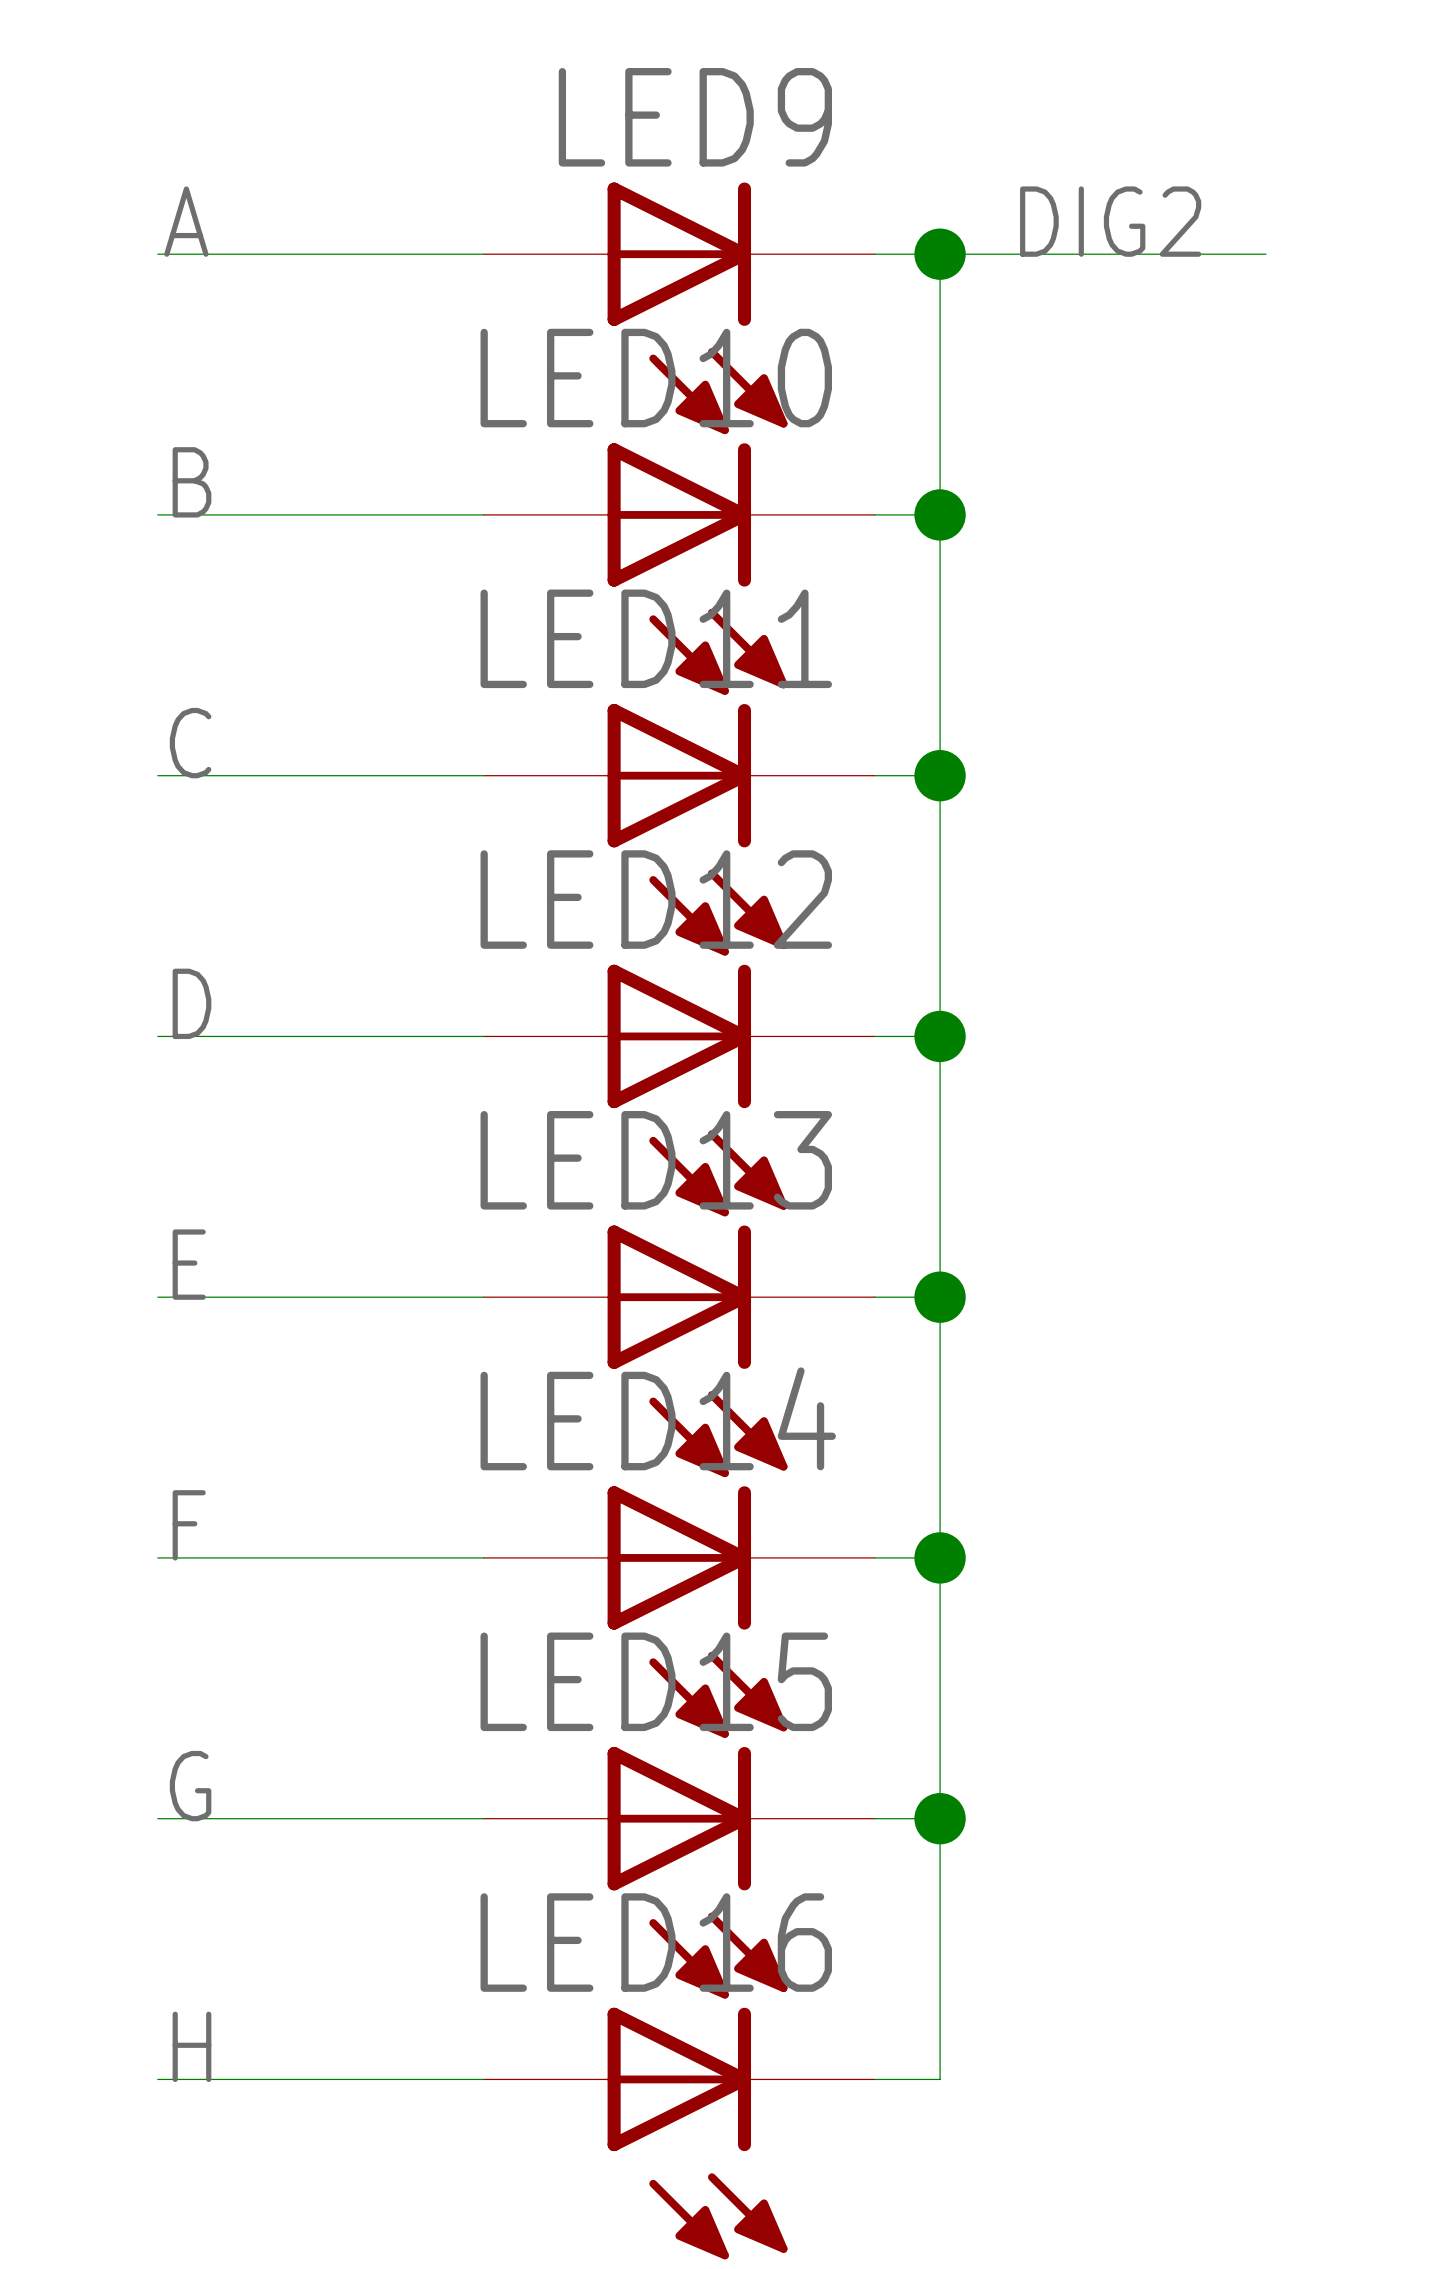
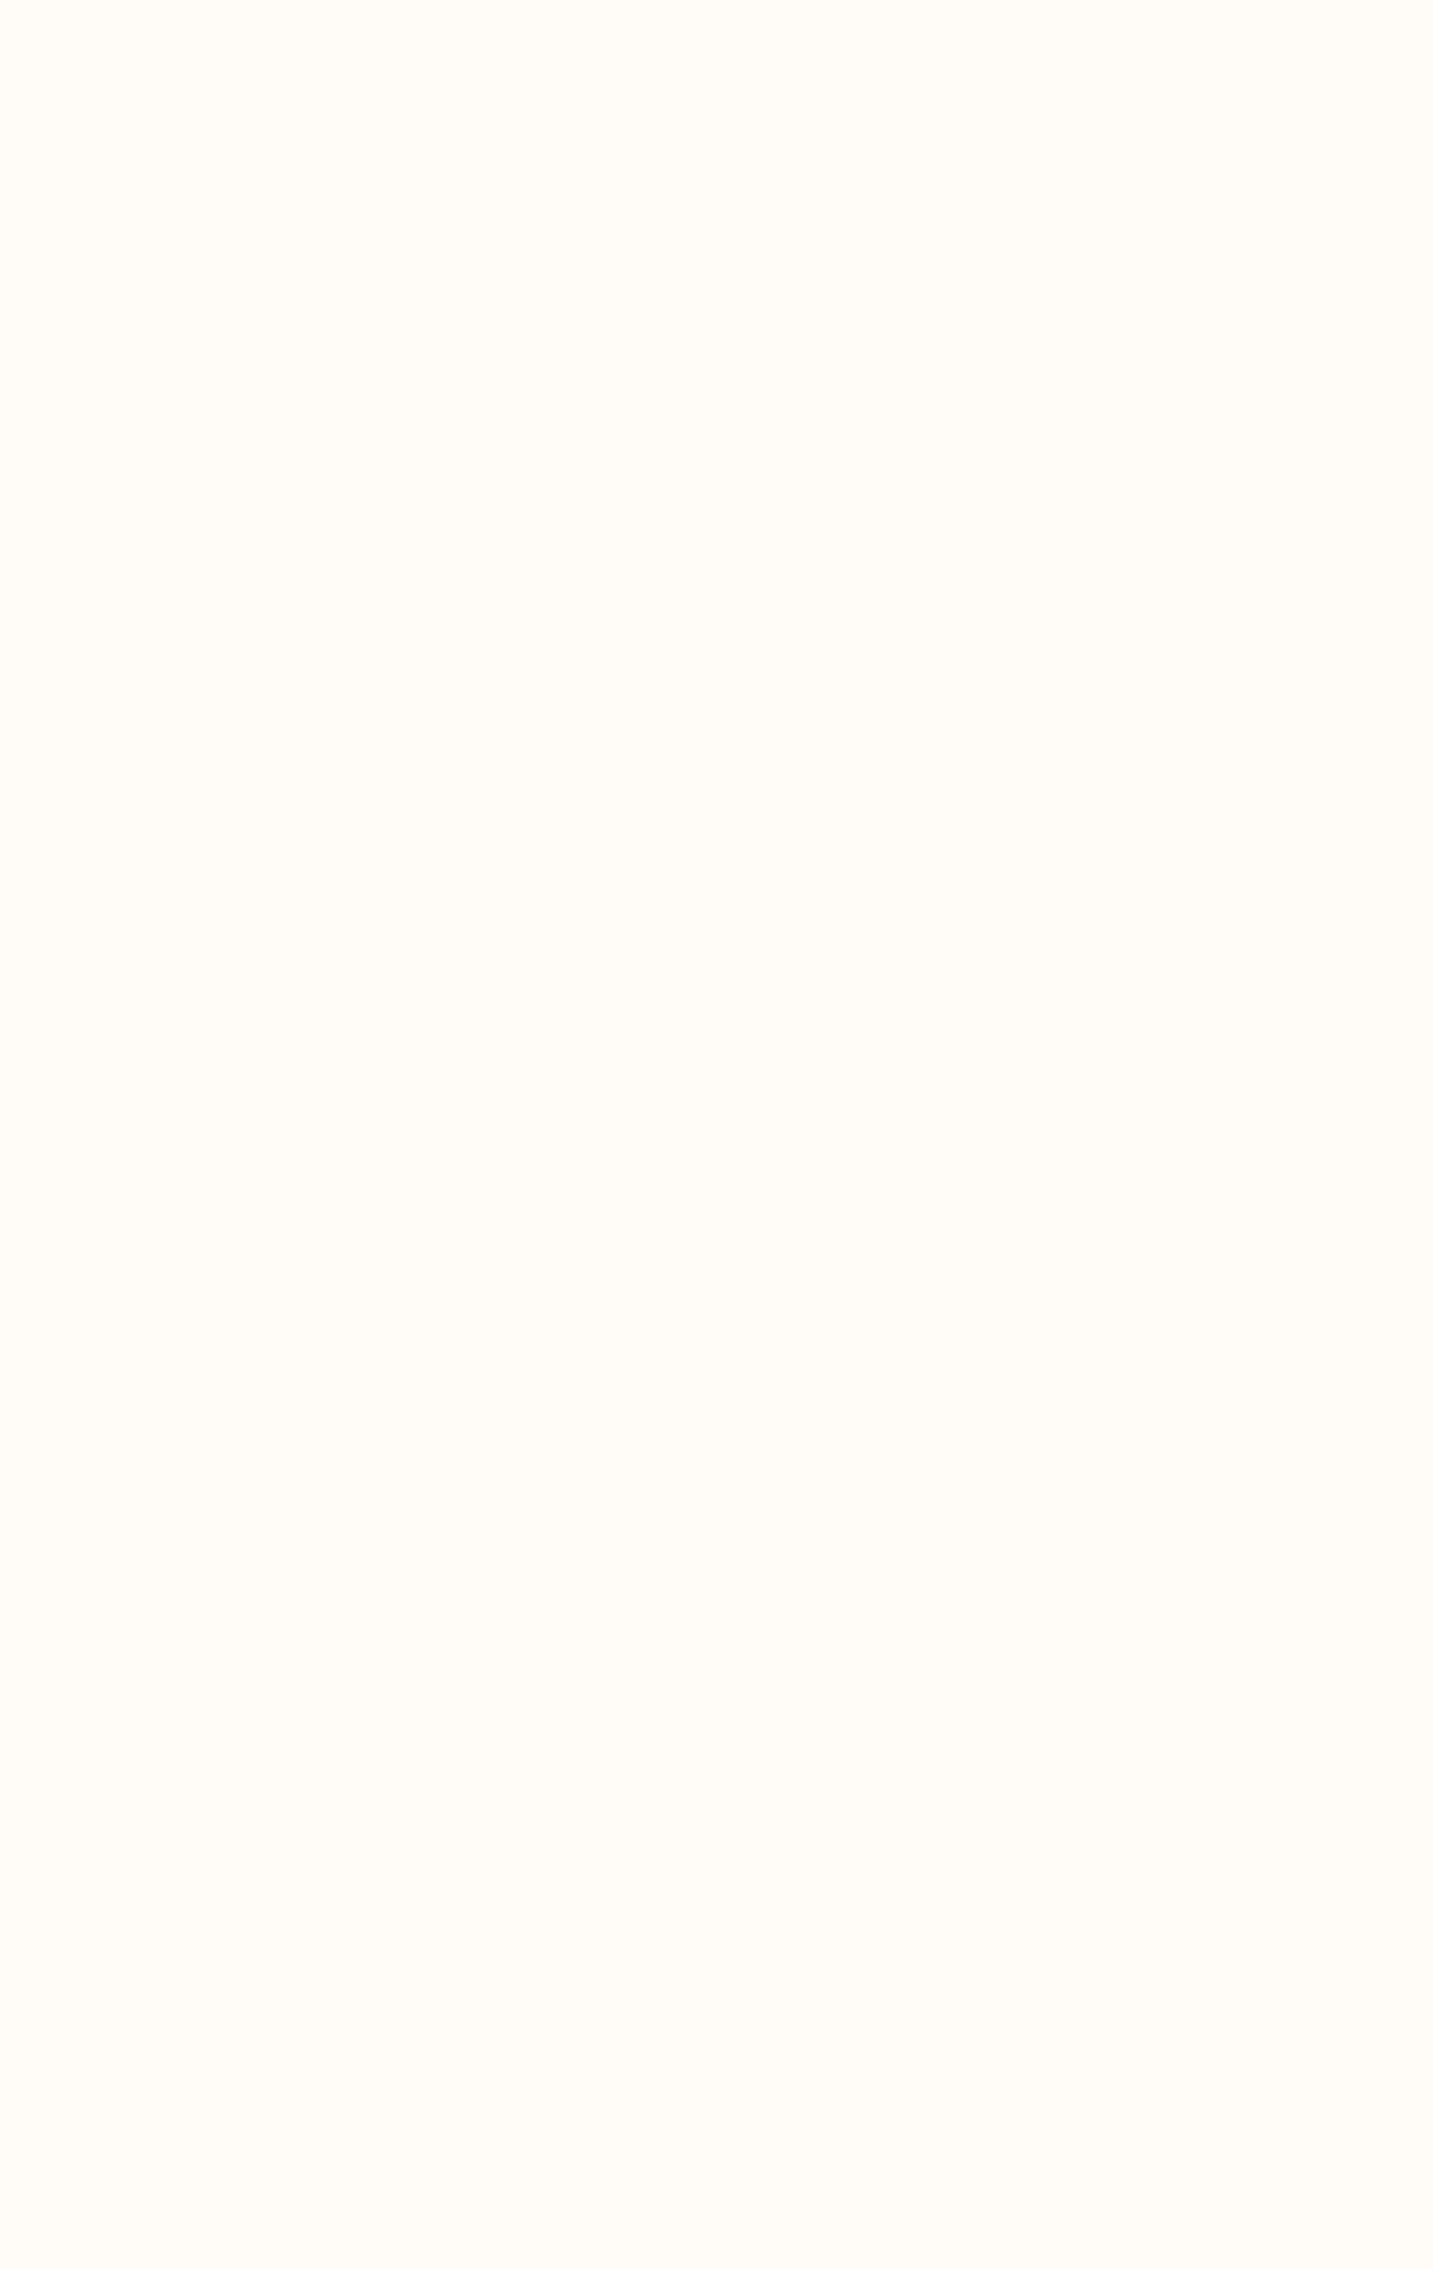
label: A (186, 221) -> none
label: DIG2 (1110, 221) -> none
wire: (157, 254) (483, 254) -> none
wire: (874, 254) (1266, 254) -> none
wire: (940, 254) (940, 2079) (874, 2079) -> none
junction: (940, 254) -> none
LED9: (679, 308) -> none
label: B (191, 482) -> none
wire: (157, 514) (483, 514) -> none
wire: (874, 514) (940, 514) -> none
junction: (940, 514) -> none
LED10: (679, 569) -> none
label: C (190, 743) -> none
wire: (157, 775) (483, 775) -> none
wire: (874, 775) (940, 775) -> none
junction: (940, 775) -> none
LED11: (679, 829) -> none
label: D (191, 1003) -> none
wire: (157, 1036) (483, 1036) -> none
wire: (874, 1036) (940, 1036) -> none
junction: (940, 1036) -> none
LED12: (679, 1090) -> none
label: E (189, 1264) -> none
wire: (157, 1297) (483, 1297) -> none
wire: (874, 1297) (940, 1297) -> none
junction: (940, 1297) -> none
LED13: (679, 1351) -> none
label: F (189, 1525) -> none
wire: (157, 1557) (483, 1557) -> none
wire: (874, 1557) (940, 1557) -> none
junction: (940, 1557) -> none
LED14: (679, 1612) -> none
label: G (190, 1786) -> none
wire: (157, 1818) (483, 1818) -> none
wire: (874, 1818) (940, 1818) -> none
junction: (940, 1818) -> none
LED15: (679, 1872) -> none
label: H (191, 2046) -> none
wire: (157, 2079) (483, 2079) -> none
LED16: (679, 2133) -> none

